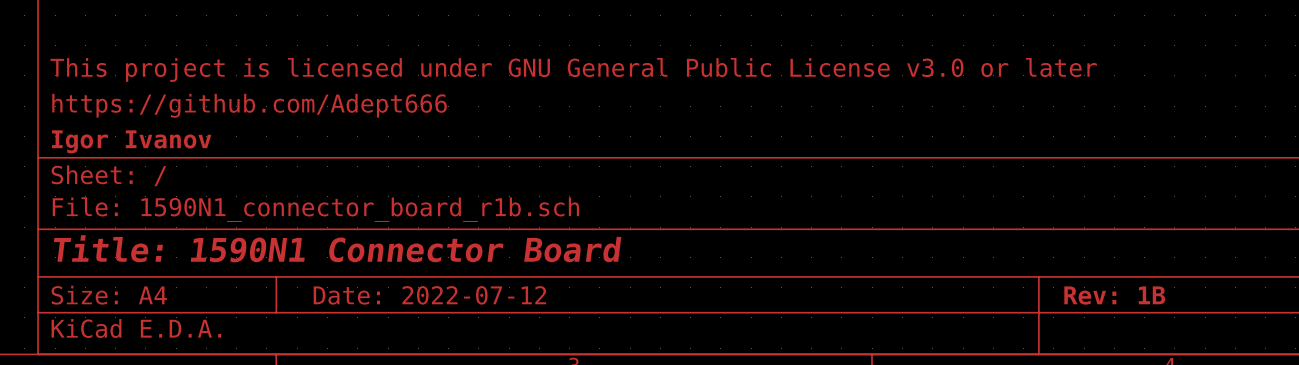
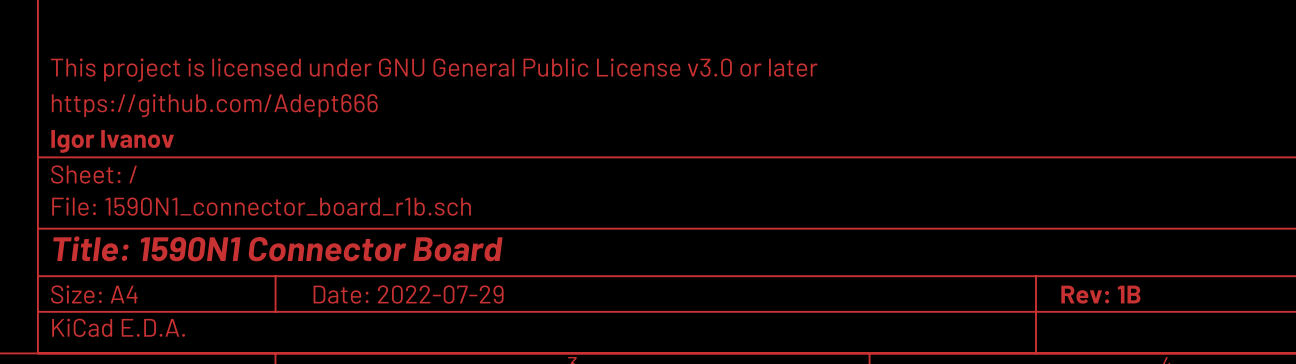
title block: Date: 2022-07-12 (429, 295) -> Date: 2022-07-29 (408, 294)

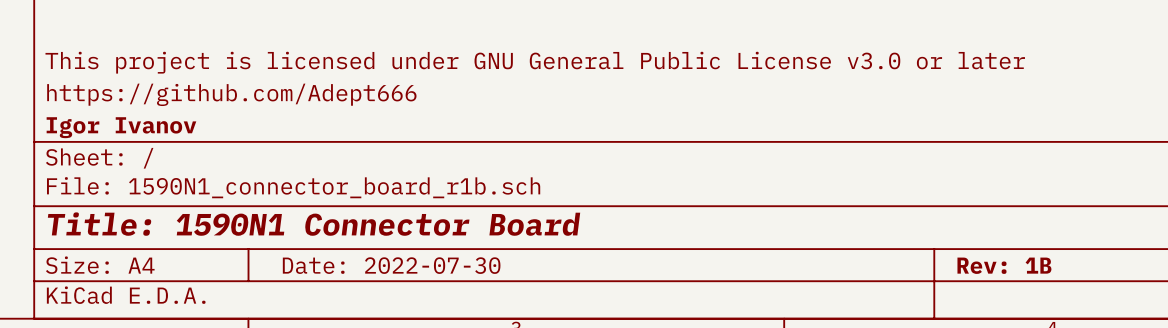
title block: Date: 2022-07-29 (408, 294) -> Date: 2022-07-30 (391, 265)

